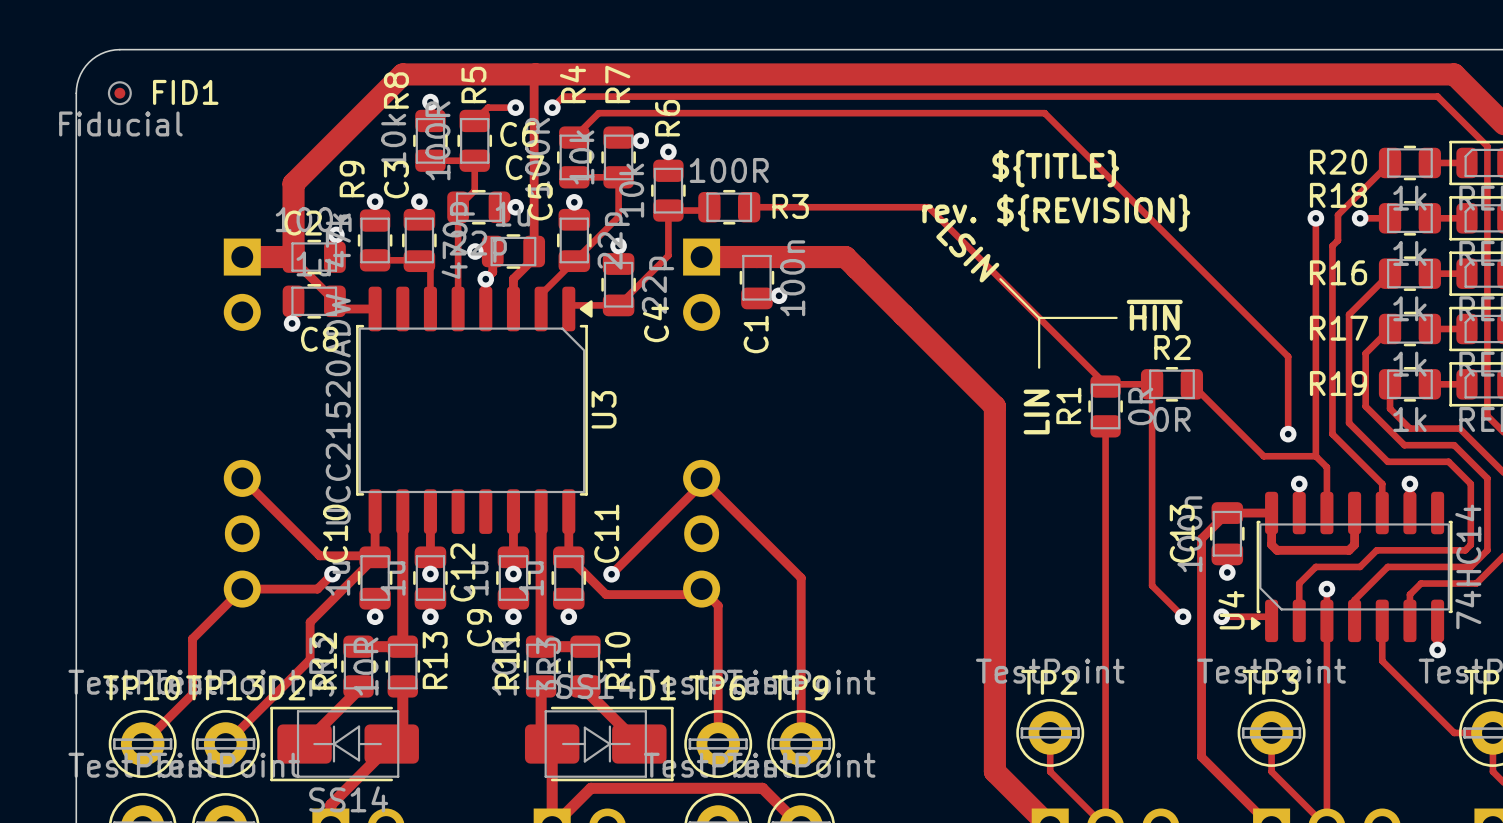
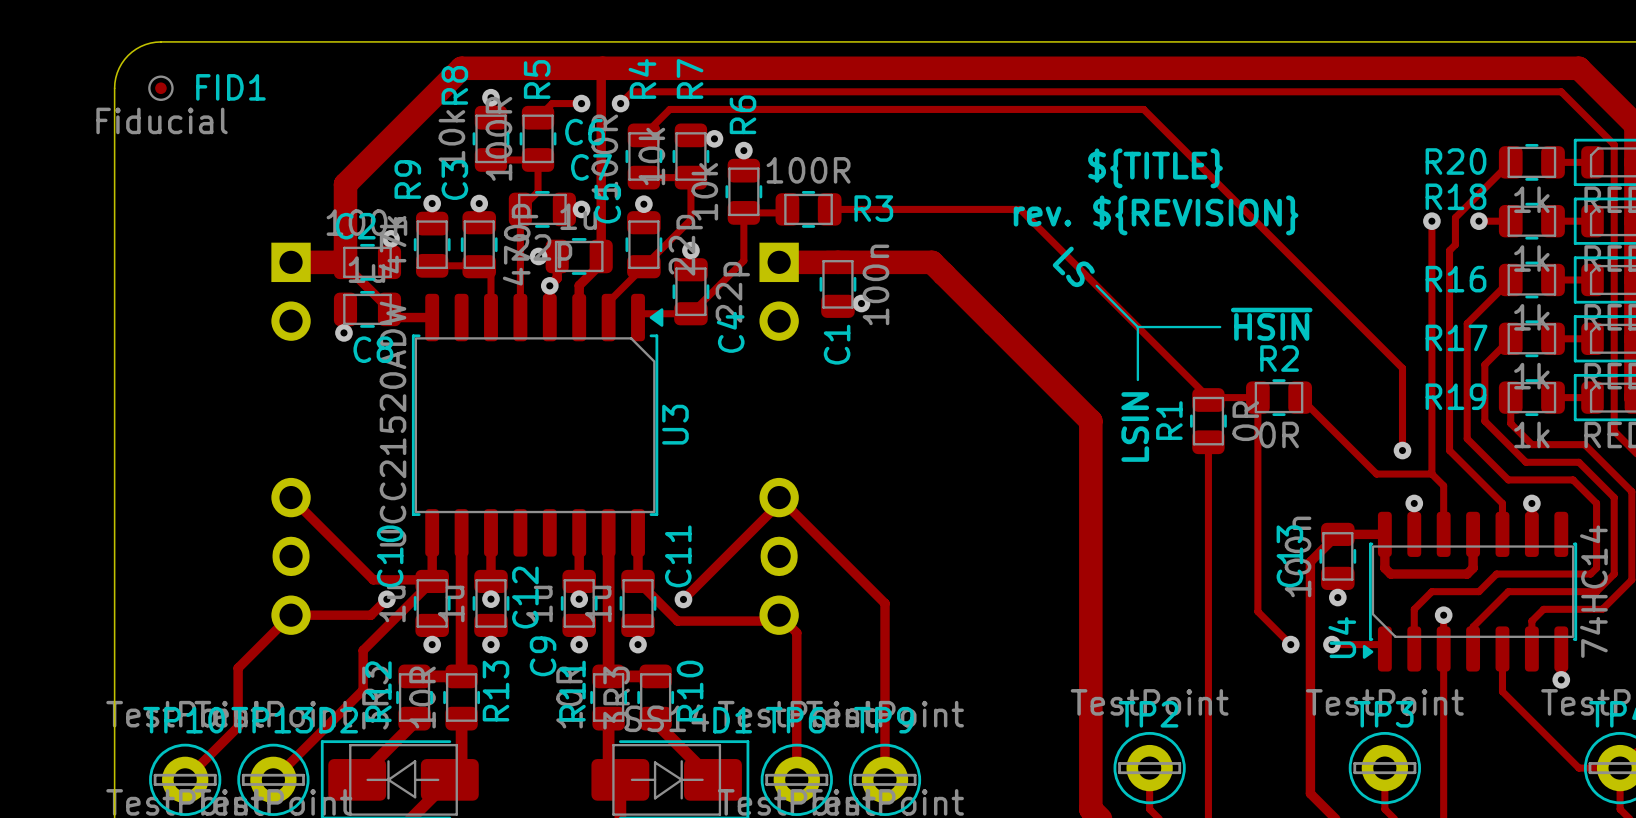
text: LSIN (967, 250) -> LS (1073, 266)
text: ~{HIN} (1154, 315) -> ~{HSIN} (1271, 324)
text: LIN (1036, 411) -> LSIN (1135, 427)

